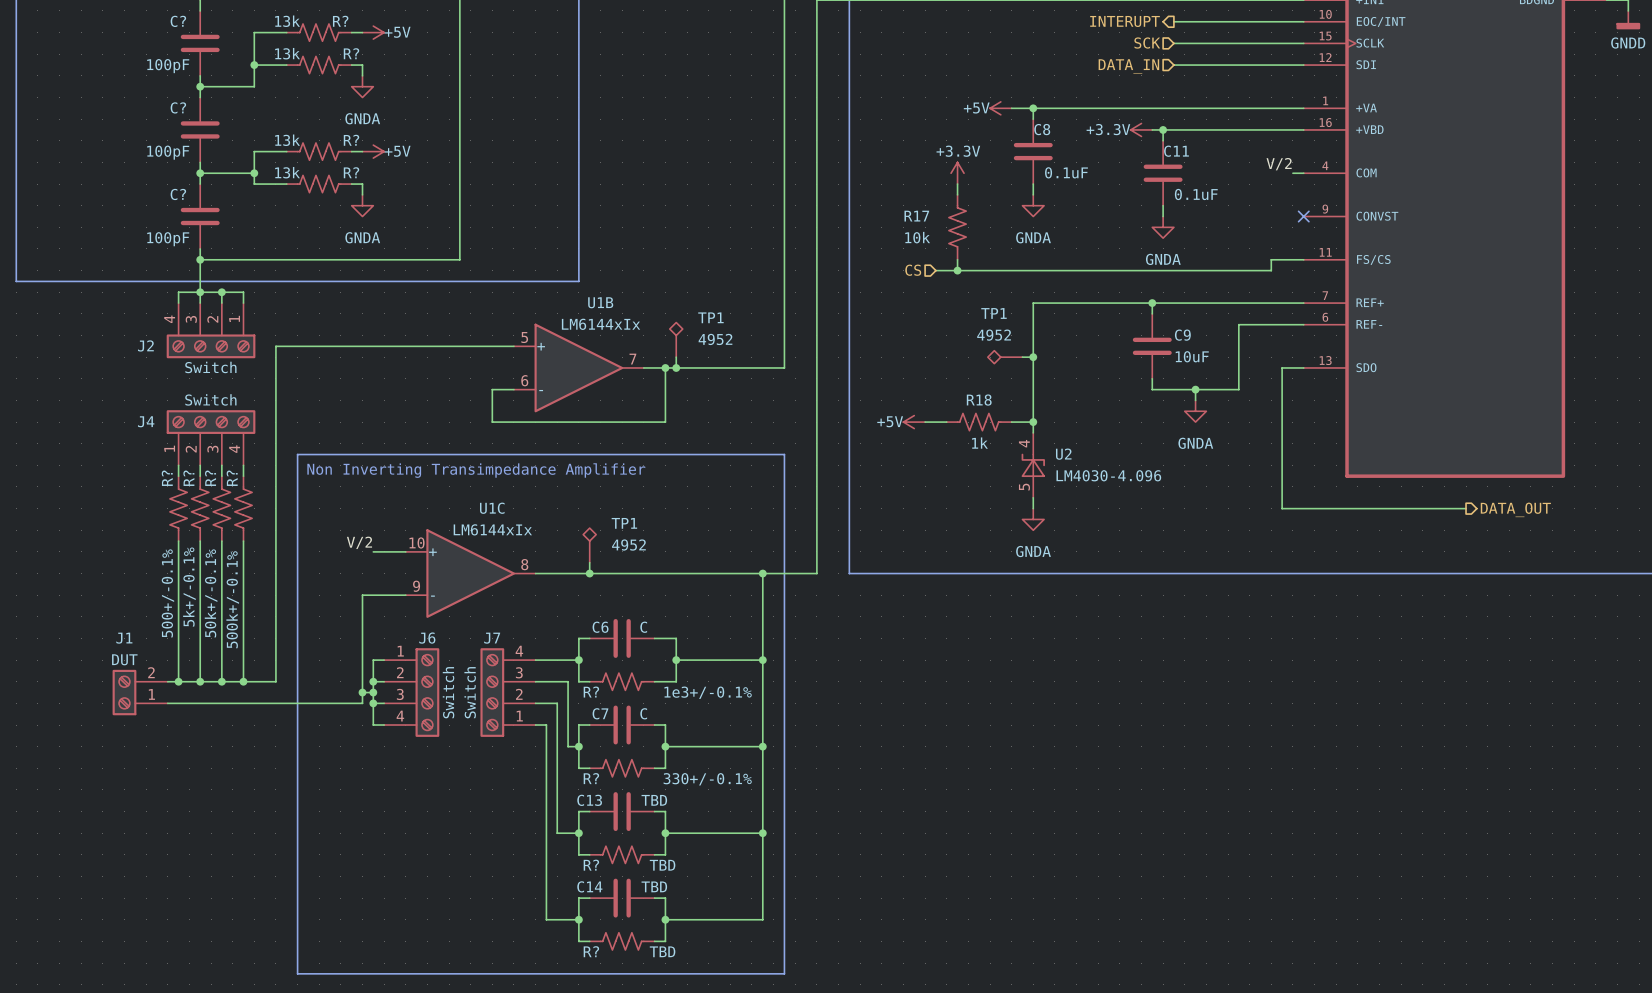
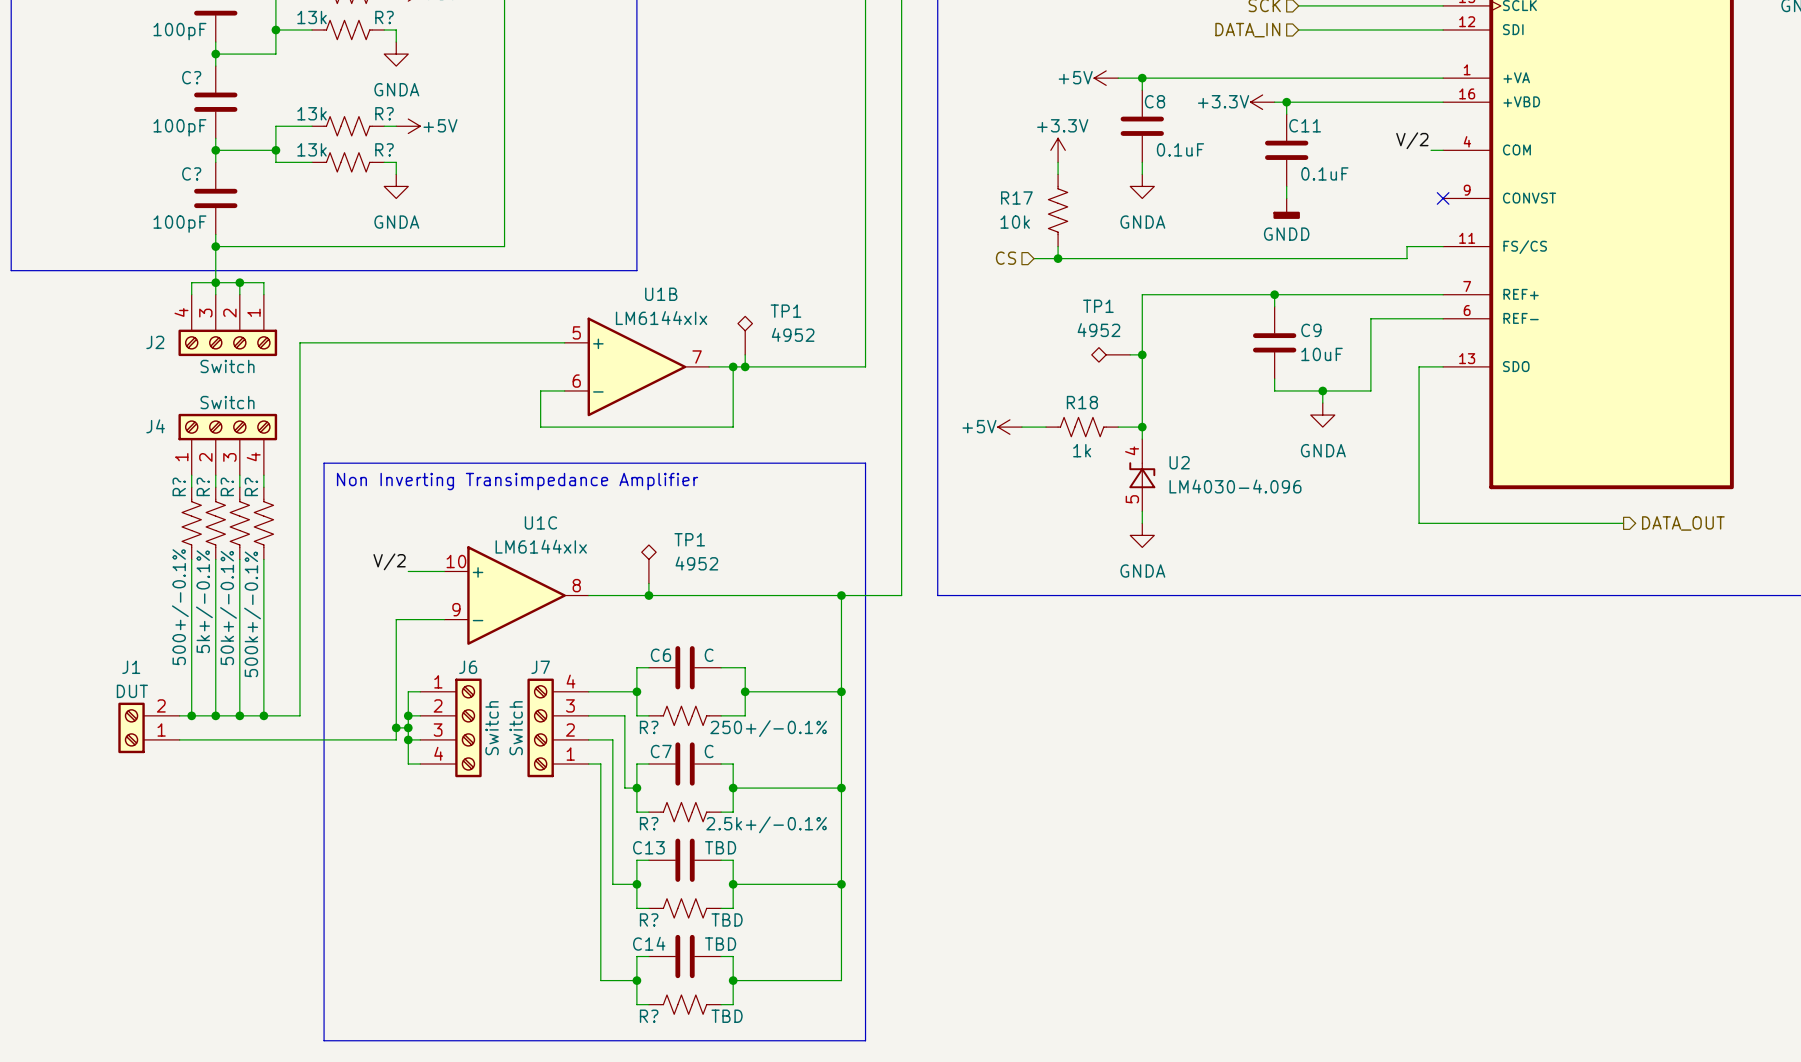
power symbol: GNDA (1163, 227) -> GNDD (1286, 208)
R? value: 1e3+/-0.1% (708, 692) -> 250+/-0.1% (768, 728)
R? value: 330+/-0.1% (707, 779) -> 2.5k+/-0.1% (766, 824)

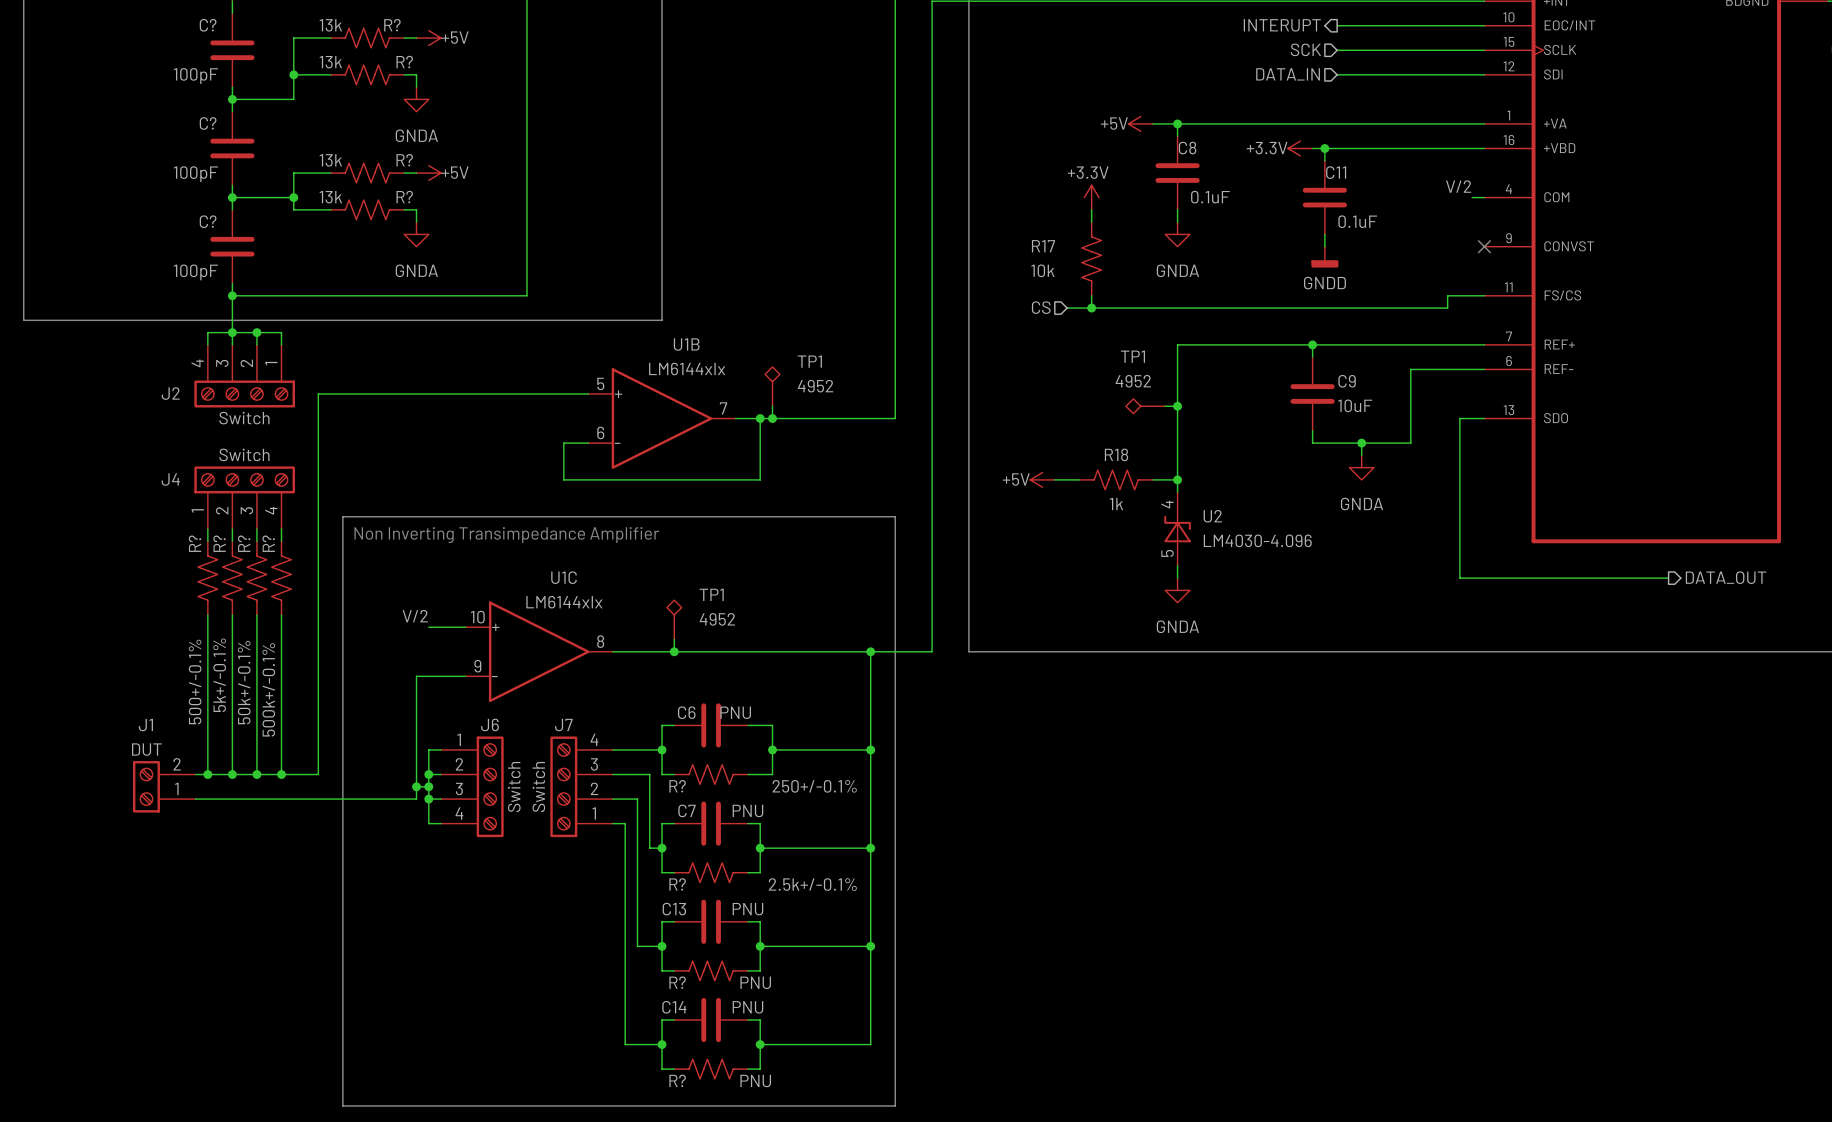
C6 value: C (709, 655) -> PNU (735, 712)
C7 value: C (709, 751) -> PNU (747, 810)
C13 value: TBD (720, 847) -> PNU (747, 909)
R? value: TBD (727, 919) -> PNU (755, 982)
C14 value: TBD (720, 944) -> PNU (747, 1007)
R? value: TBD (727, 1016) -> PNU (755, 1081)

